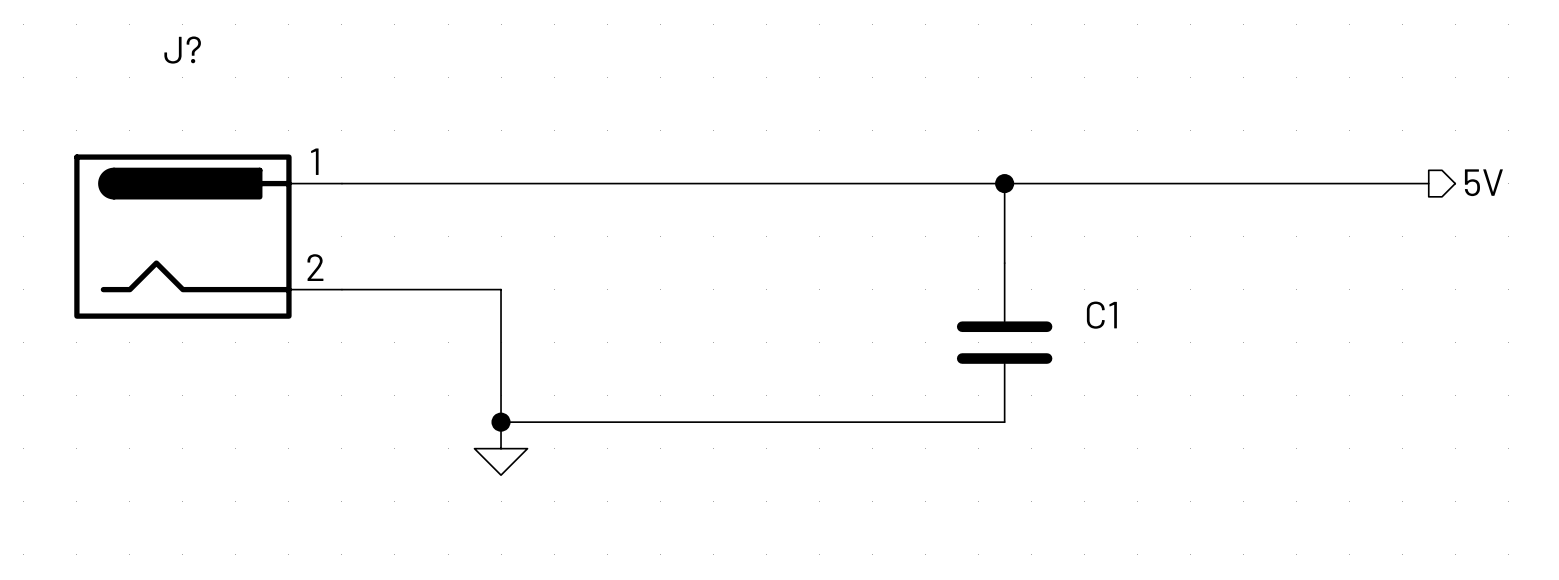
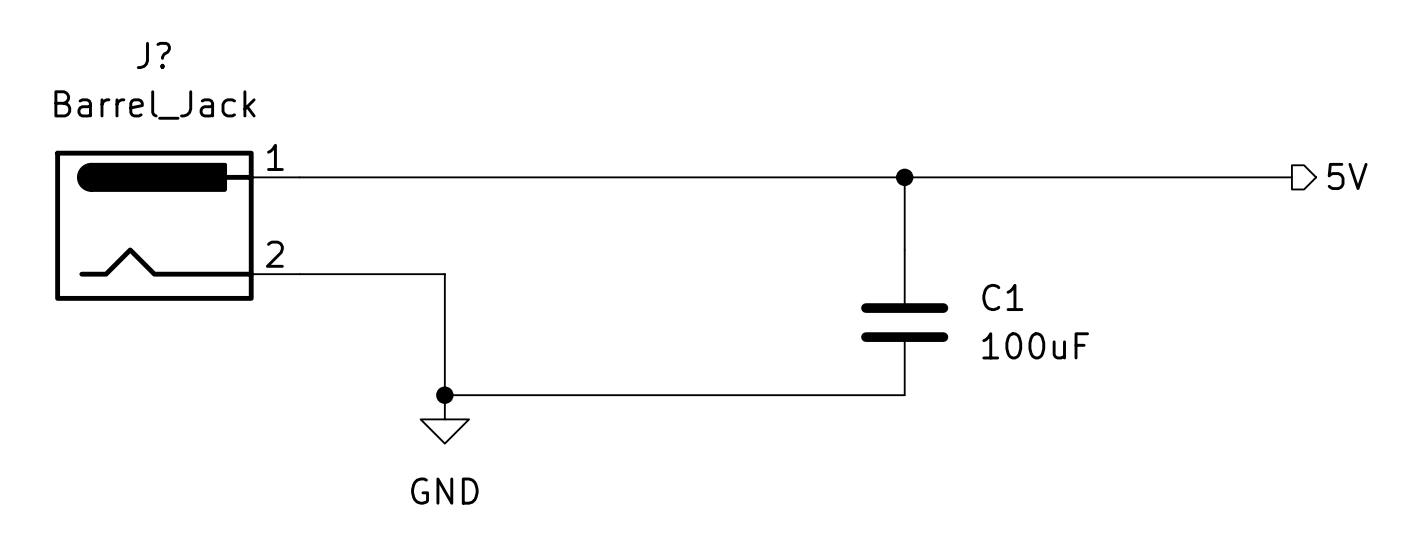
J? value: none -> Barrel_Jack (154, 105)
C1 value: none -> 100uF (1035, 345)
power symbol text: none -> GND (444, 491)

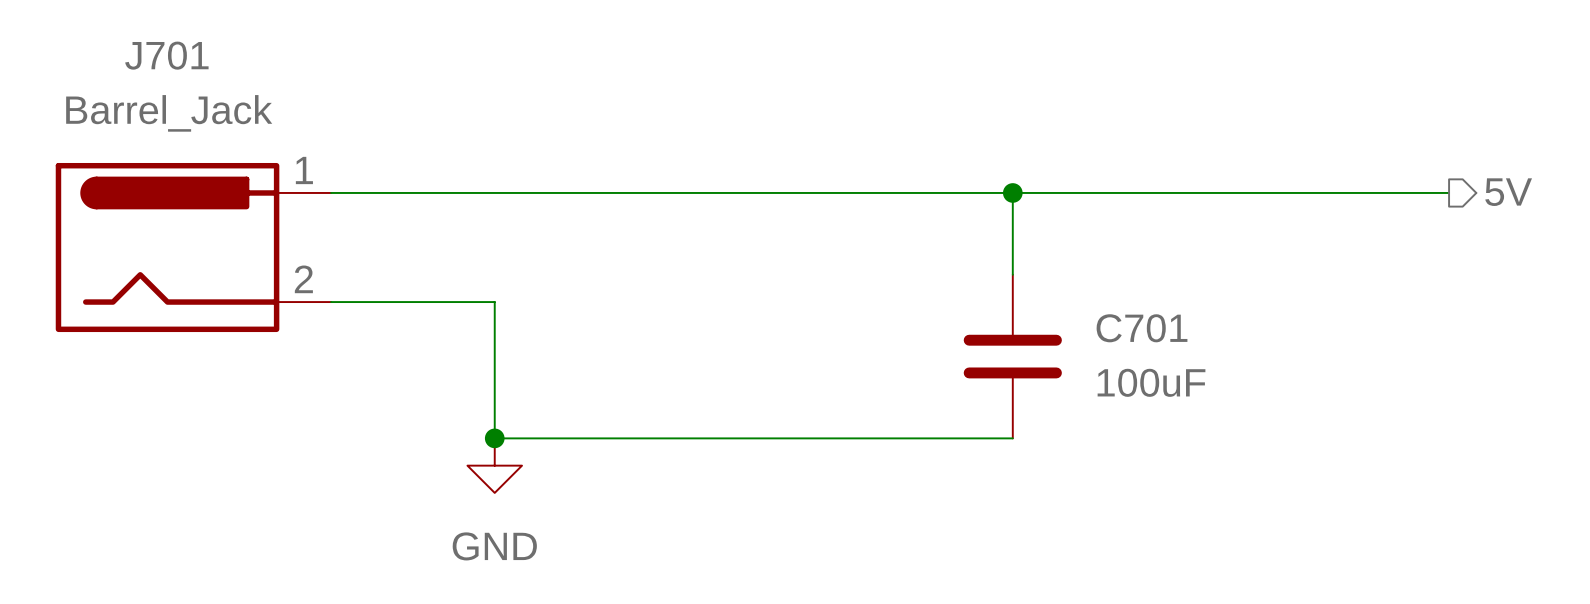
J? name: J? (153, 55) -> J701 (166, 55)
C1 name: C1 (1002, 297) -> C701 (1142, 328)

